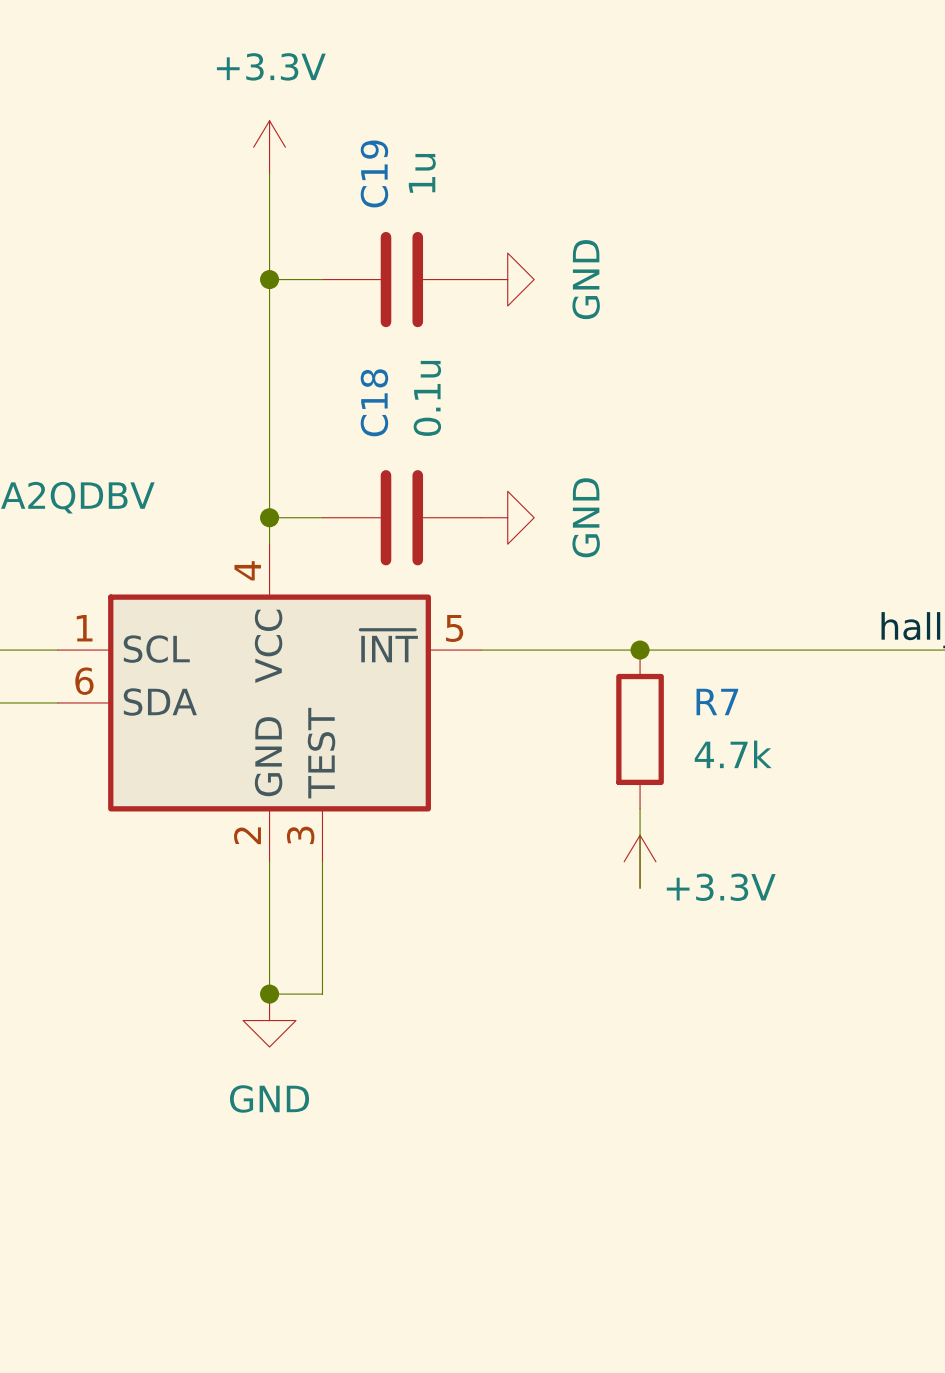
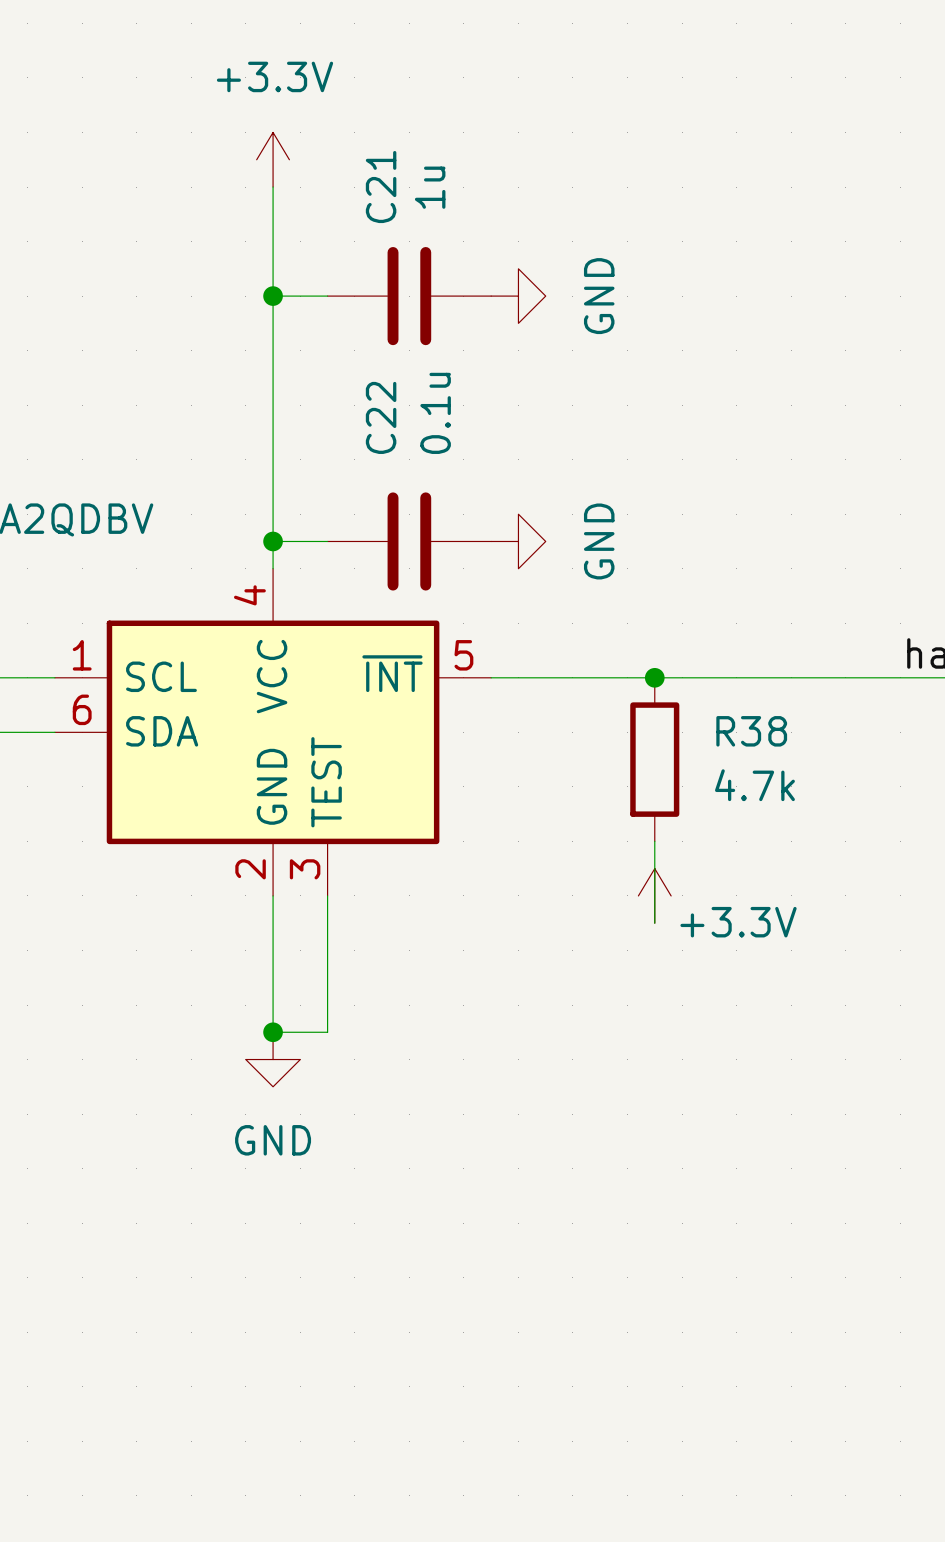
C19 name: C19 (374, 173) -> C21 (381, 187)
C18 name: C18 (374, 402) -> C22 (381, 417)
R7 name: R7 (717, 701) -> R38 (751, 731)

